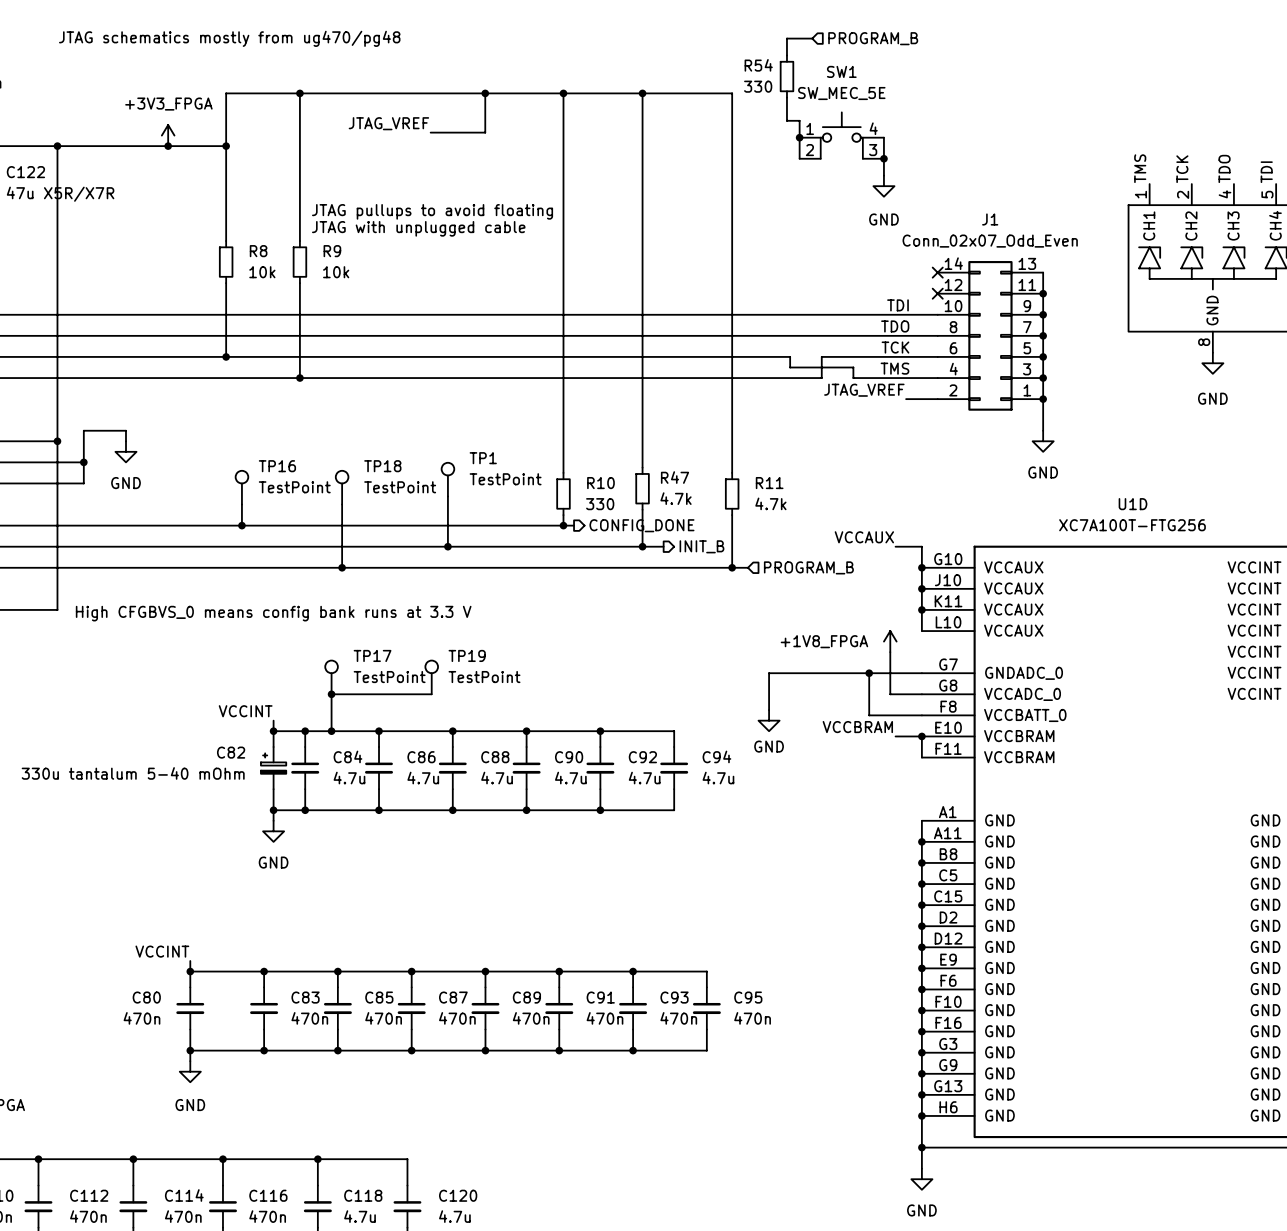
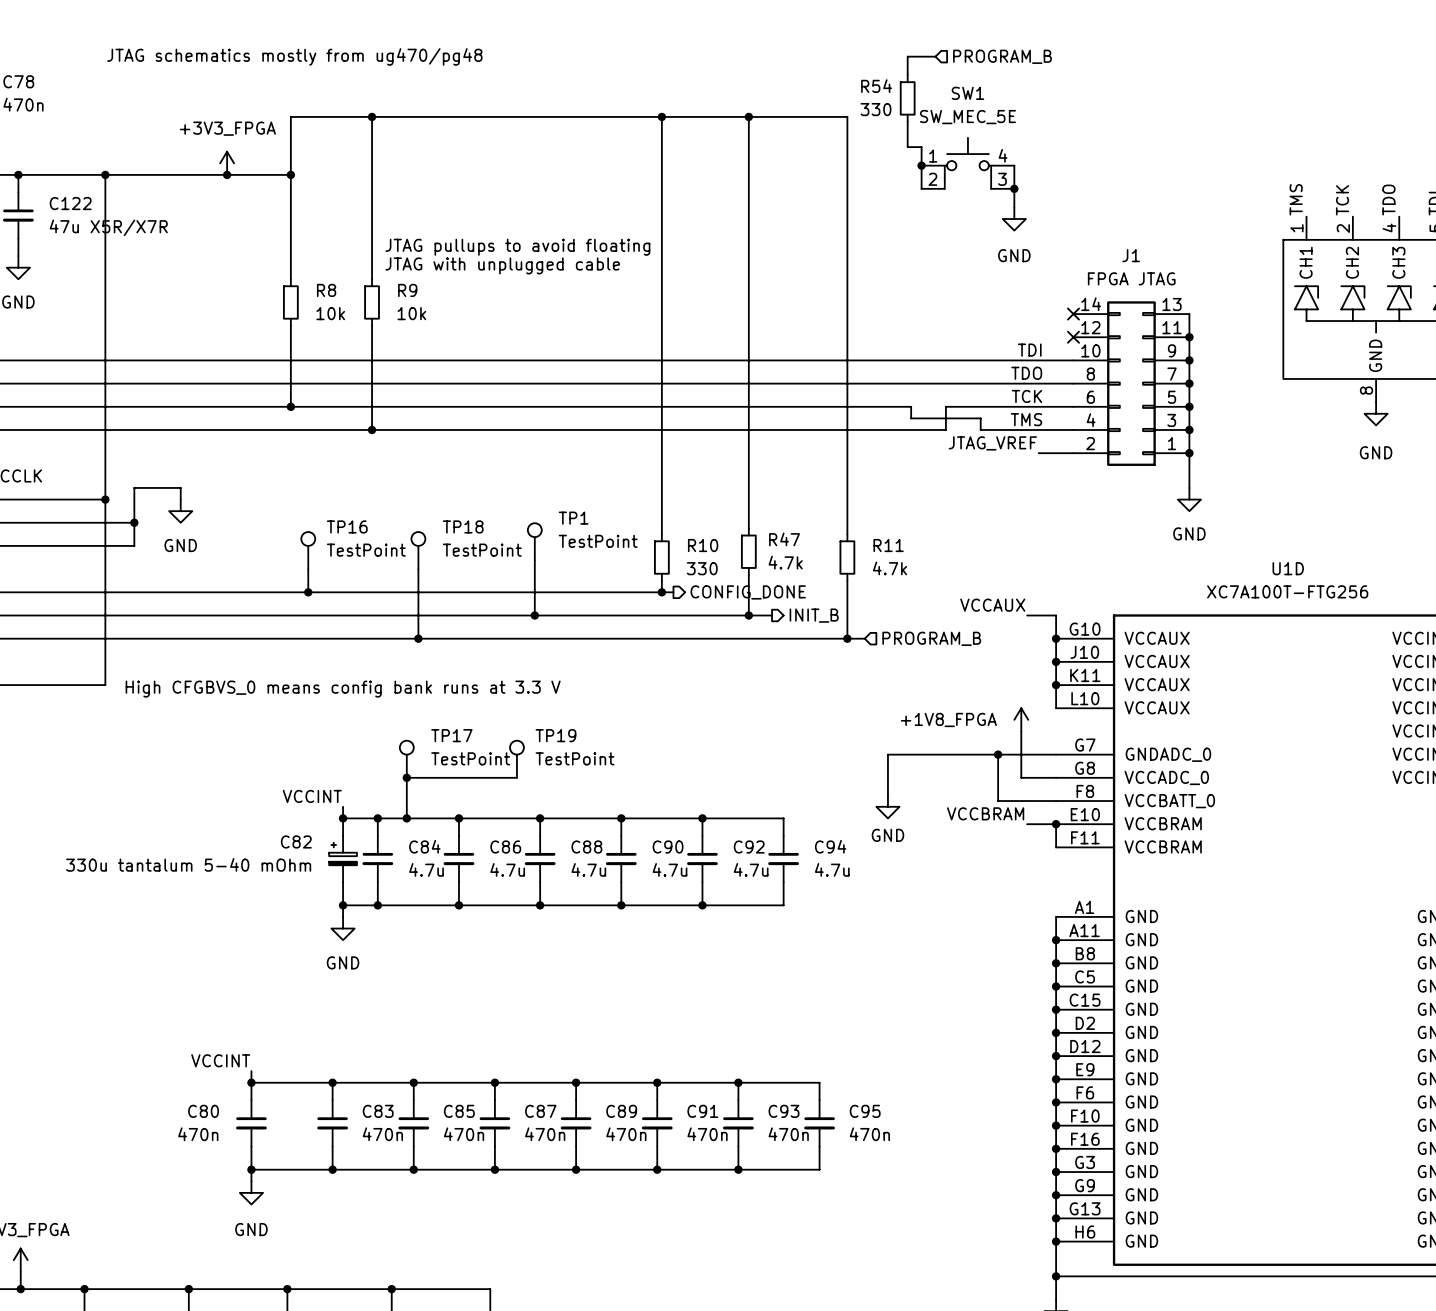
wire: (485, 93) (485, 132) (430, 132) -> none
junction: (485, 93) -> none
label: JTAG_VREF (388, 123) -> none
J1 value: Conn_02x07_Odd_Even (990, 241) -> FPGA JTAG (1131, 278)

